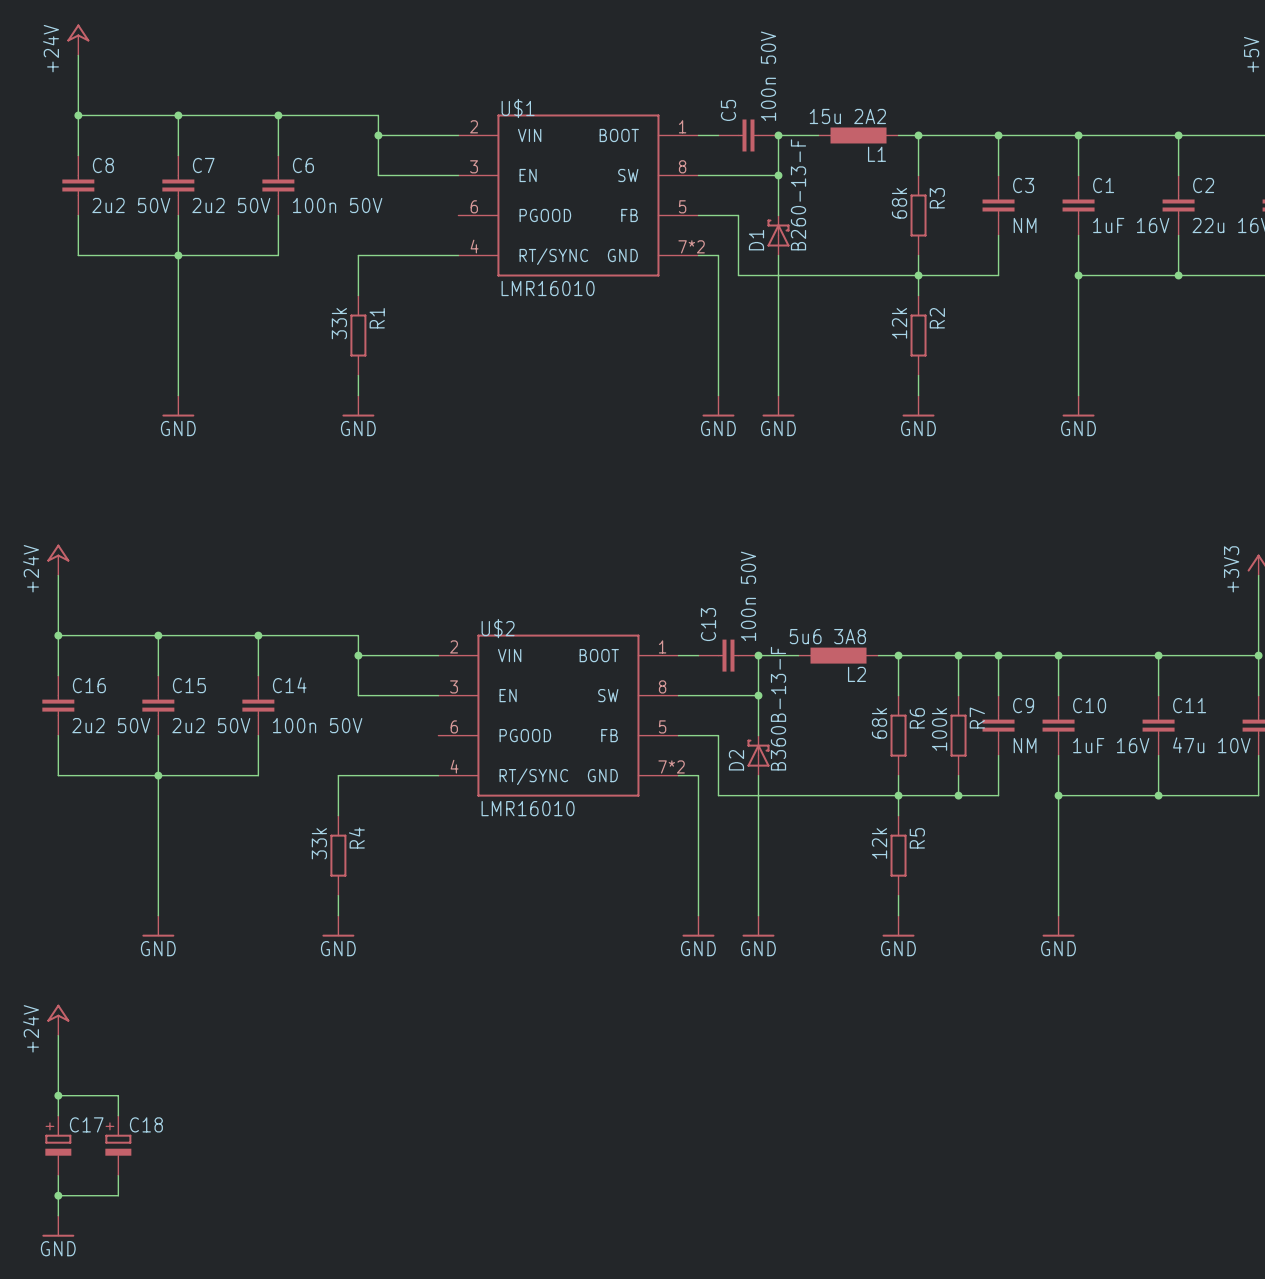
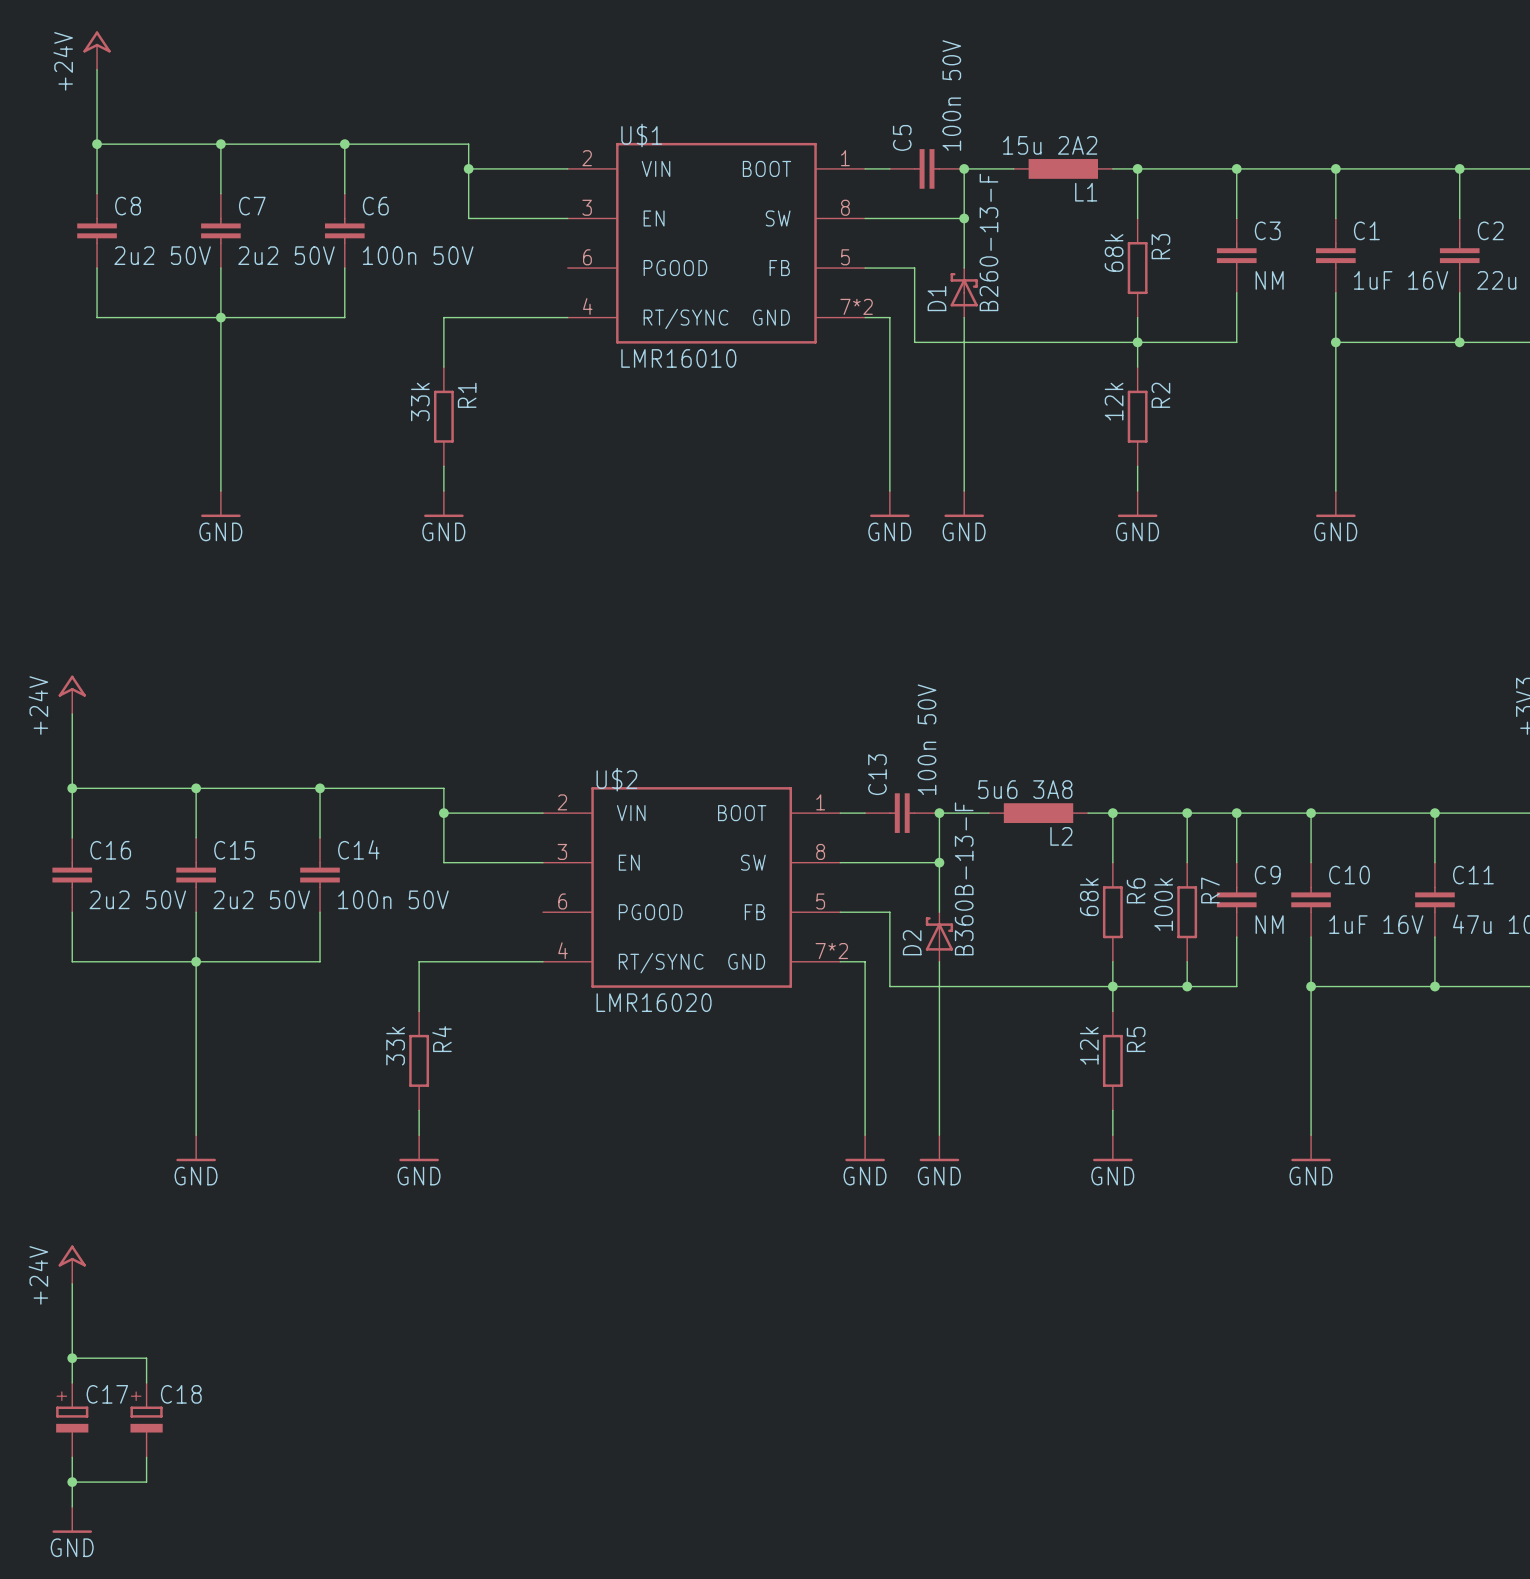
U$2 value: LMR16010 (528, 808) -> LMR16020 (654, 1002)

